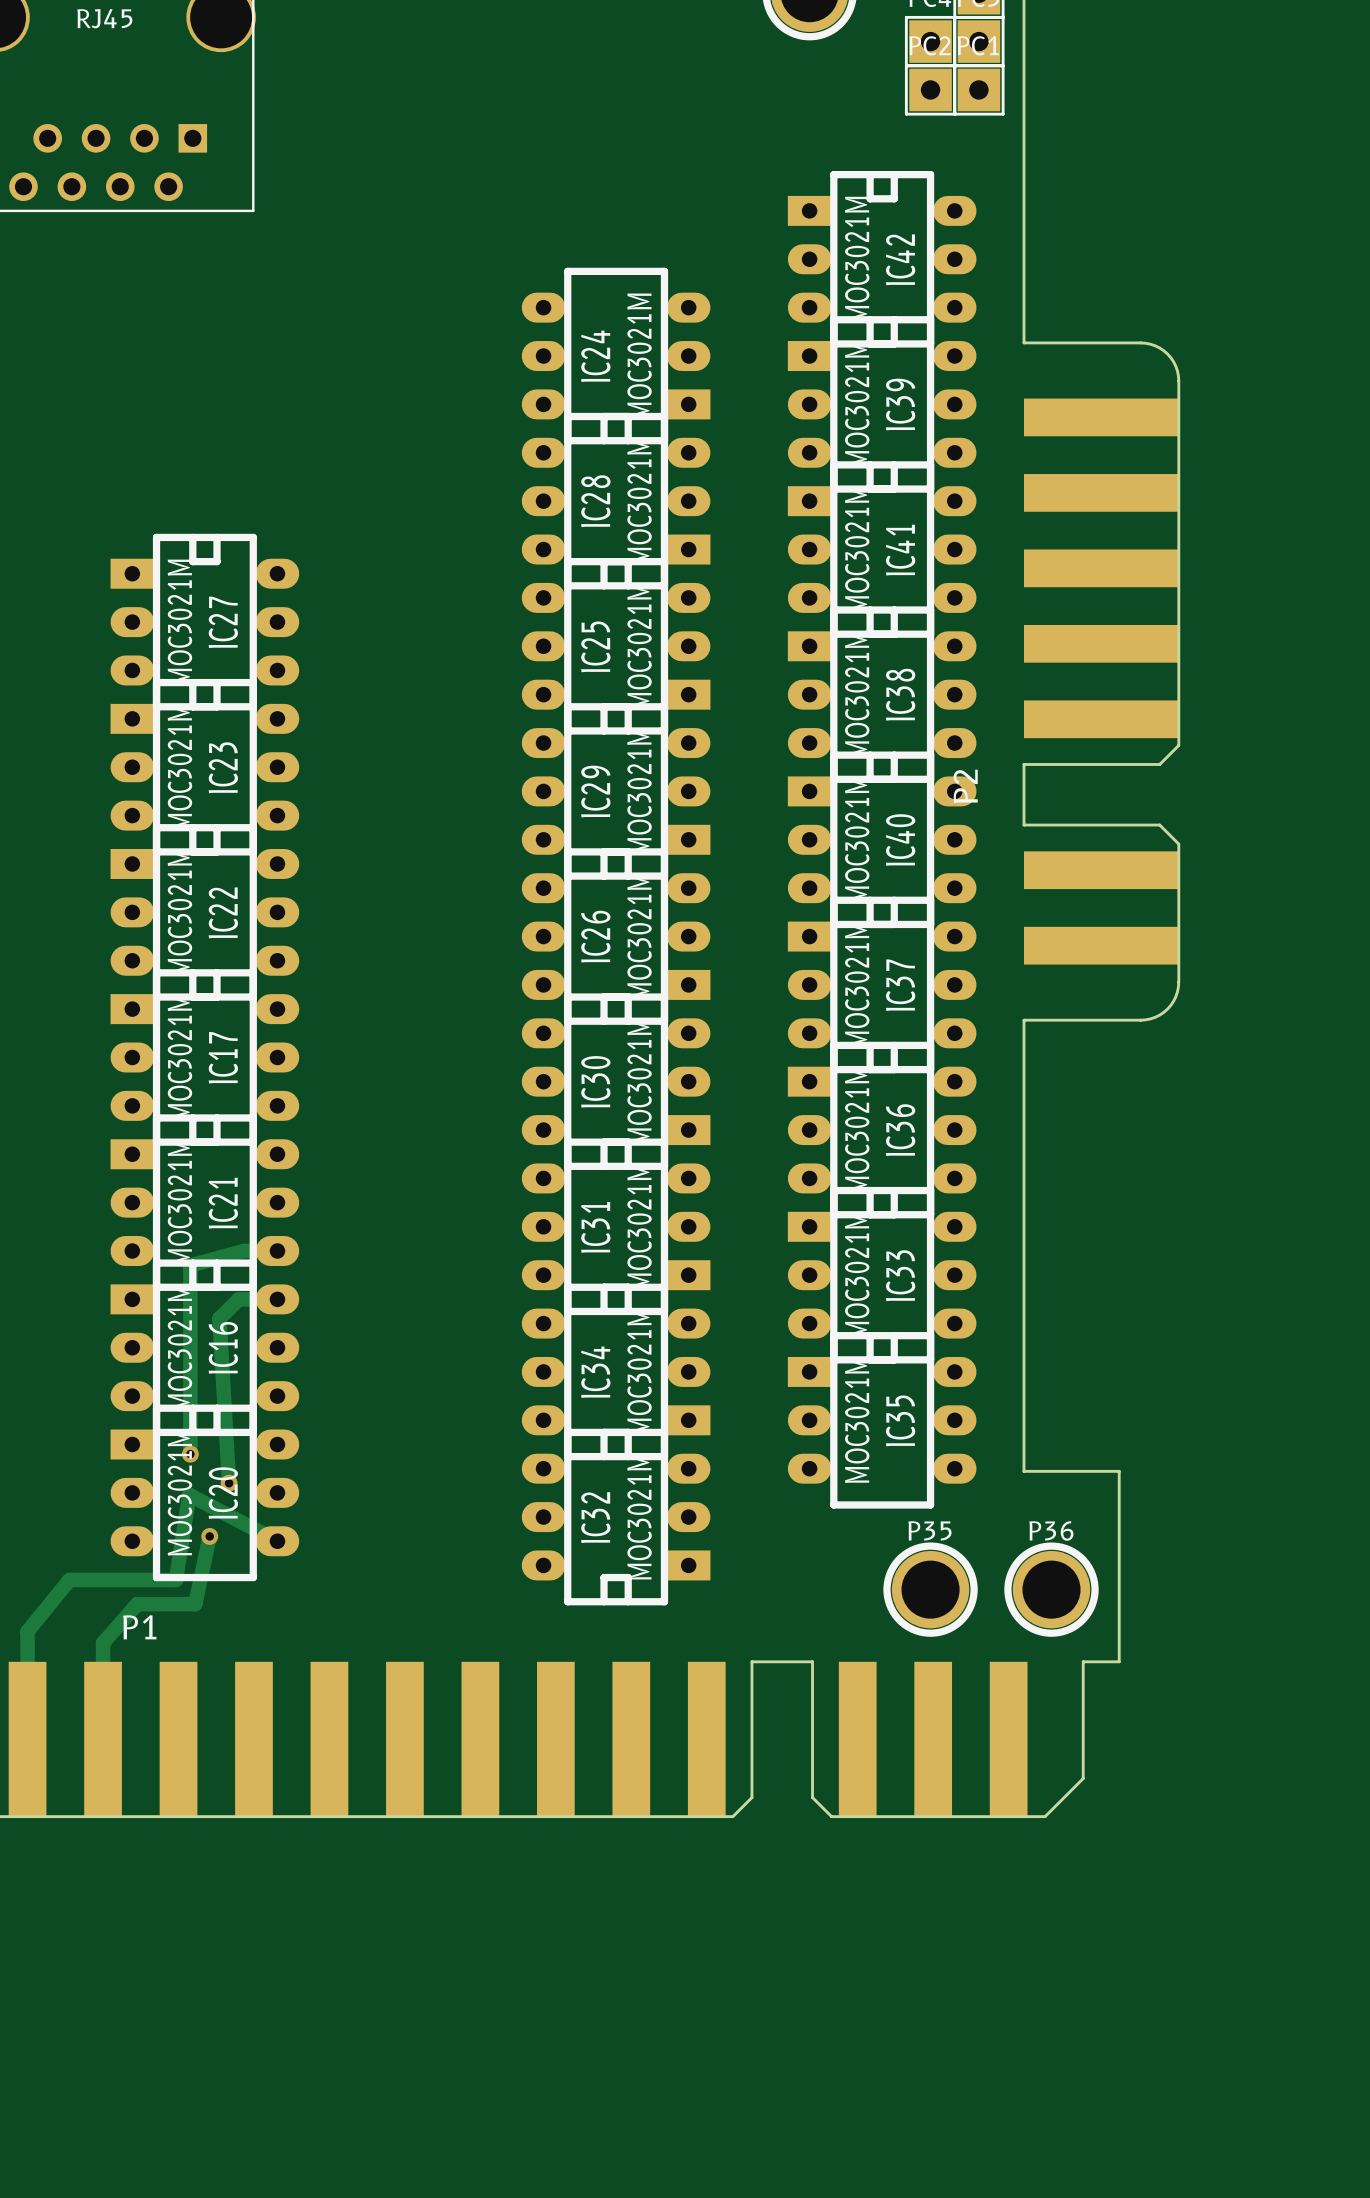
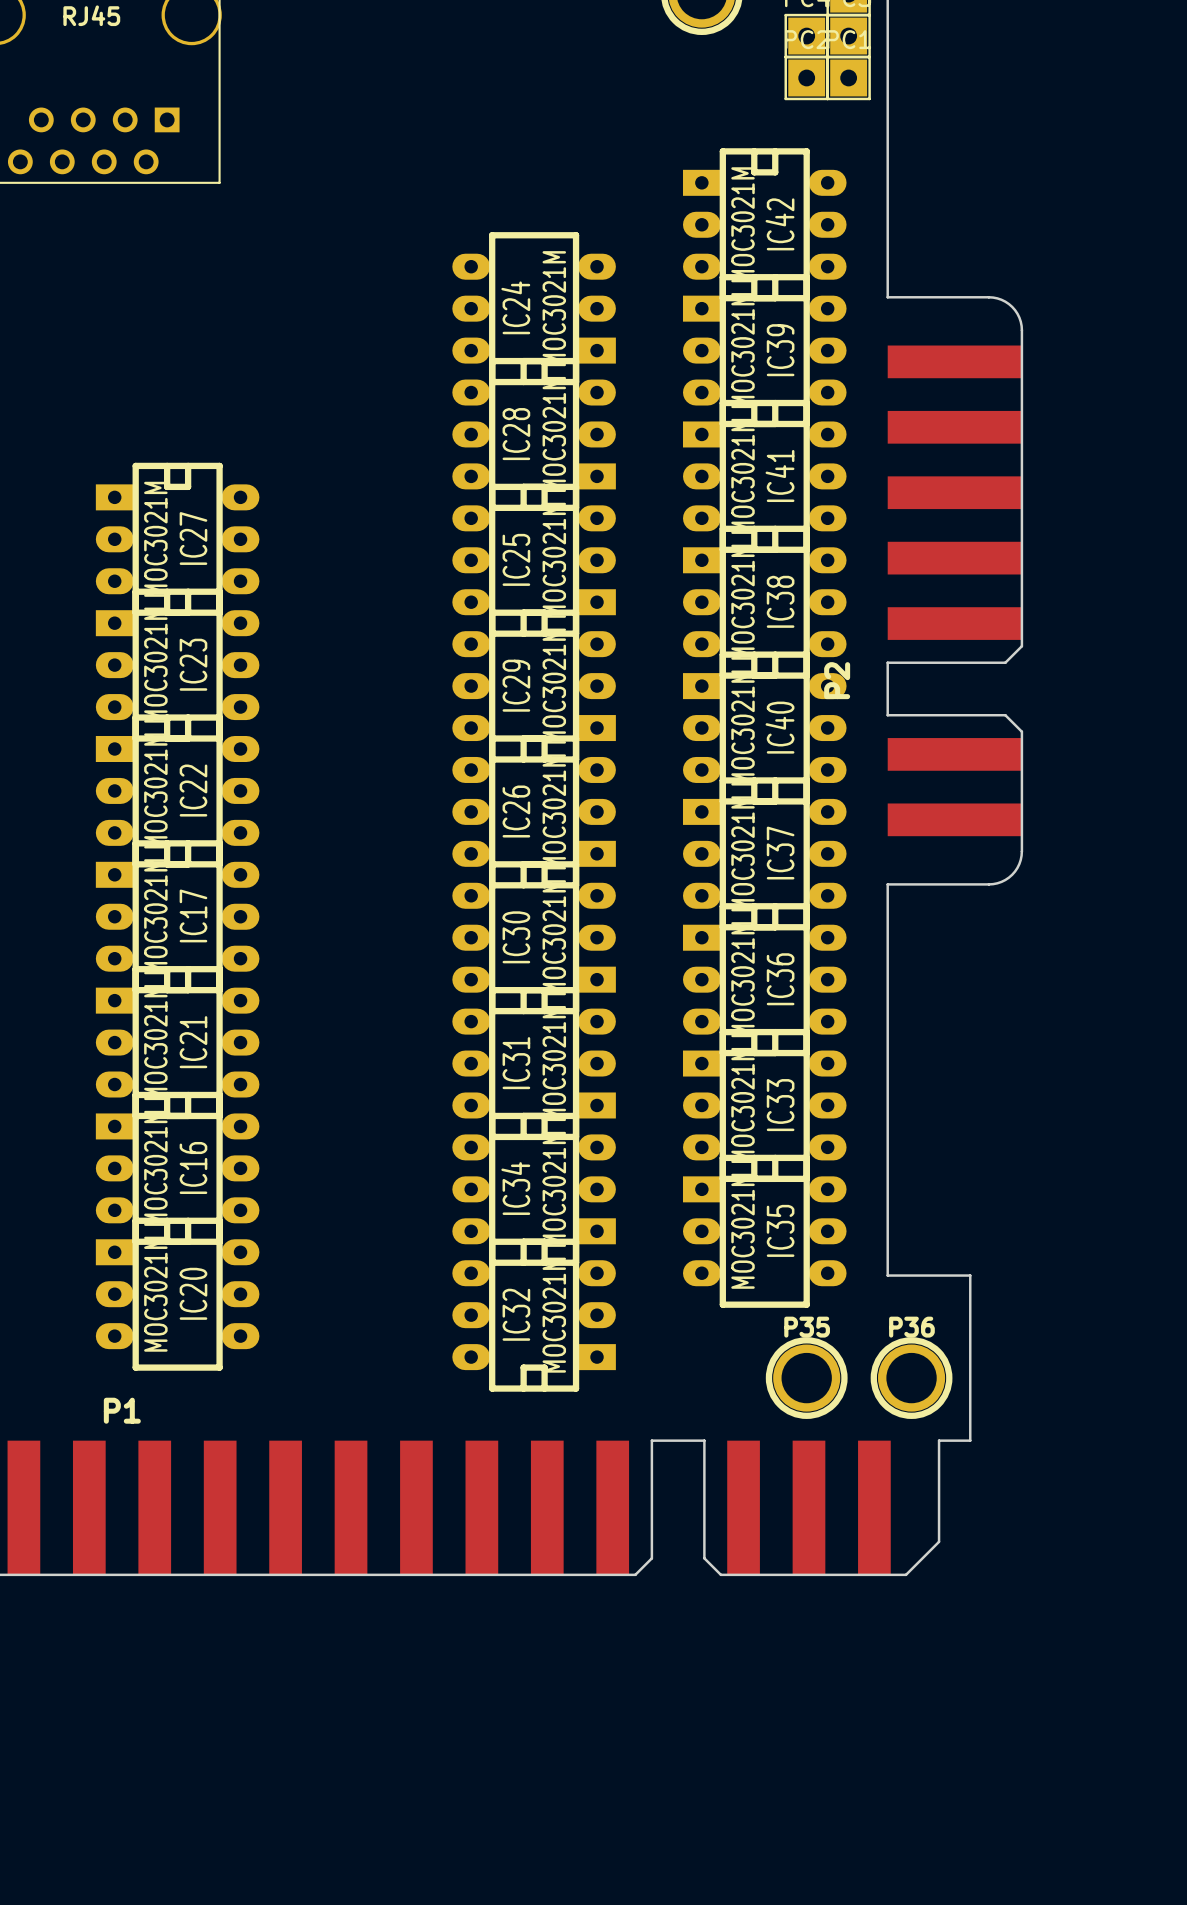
track: (277, 1251) (243, 1251) (190, 1265) (190, 1454) -> none
track: (277, 1299) (238, 1299) (219, 1318) (229, 1483) -> none
via: (190, 1454) -> none
via: (229, 1483) -> none
track: (209, 1536) (195, 1604) (137, 1604) (103, 1643) (103, 1739) -> none
via: (209, 1536) -> none
track: (277, 1541) (189, 1494) (175, 1579) (69, 1579) (27, 1631) (27, 1739) -> none

